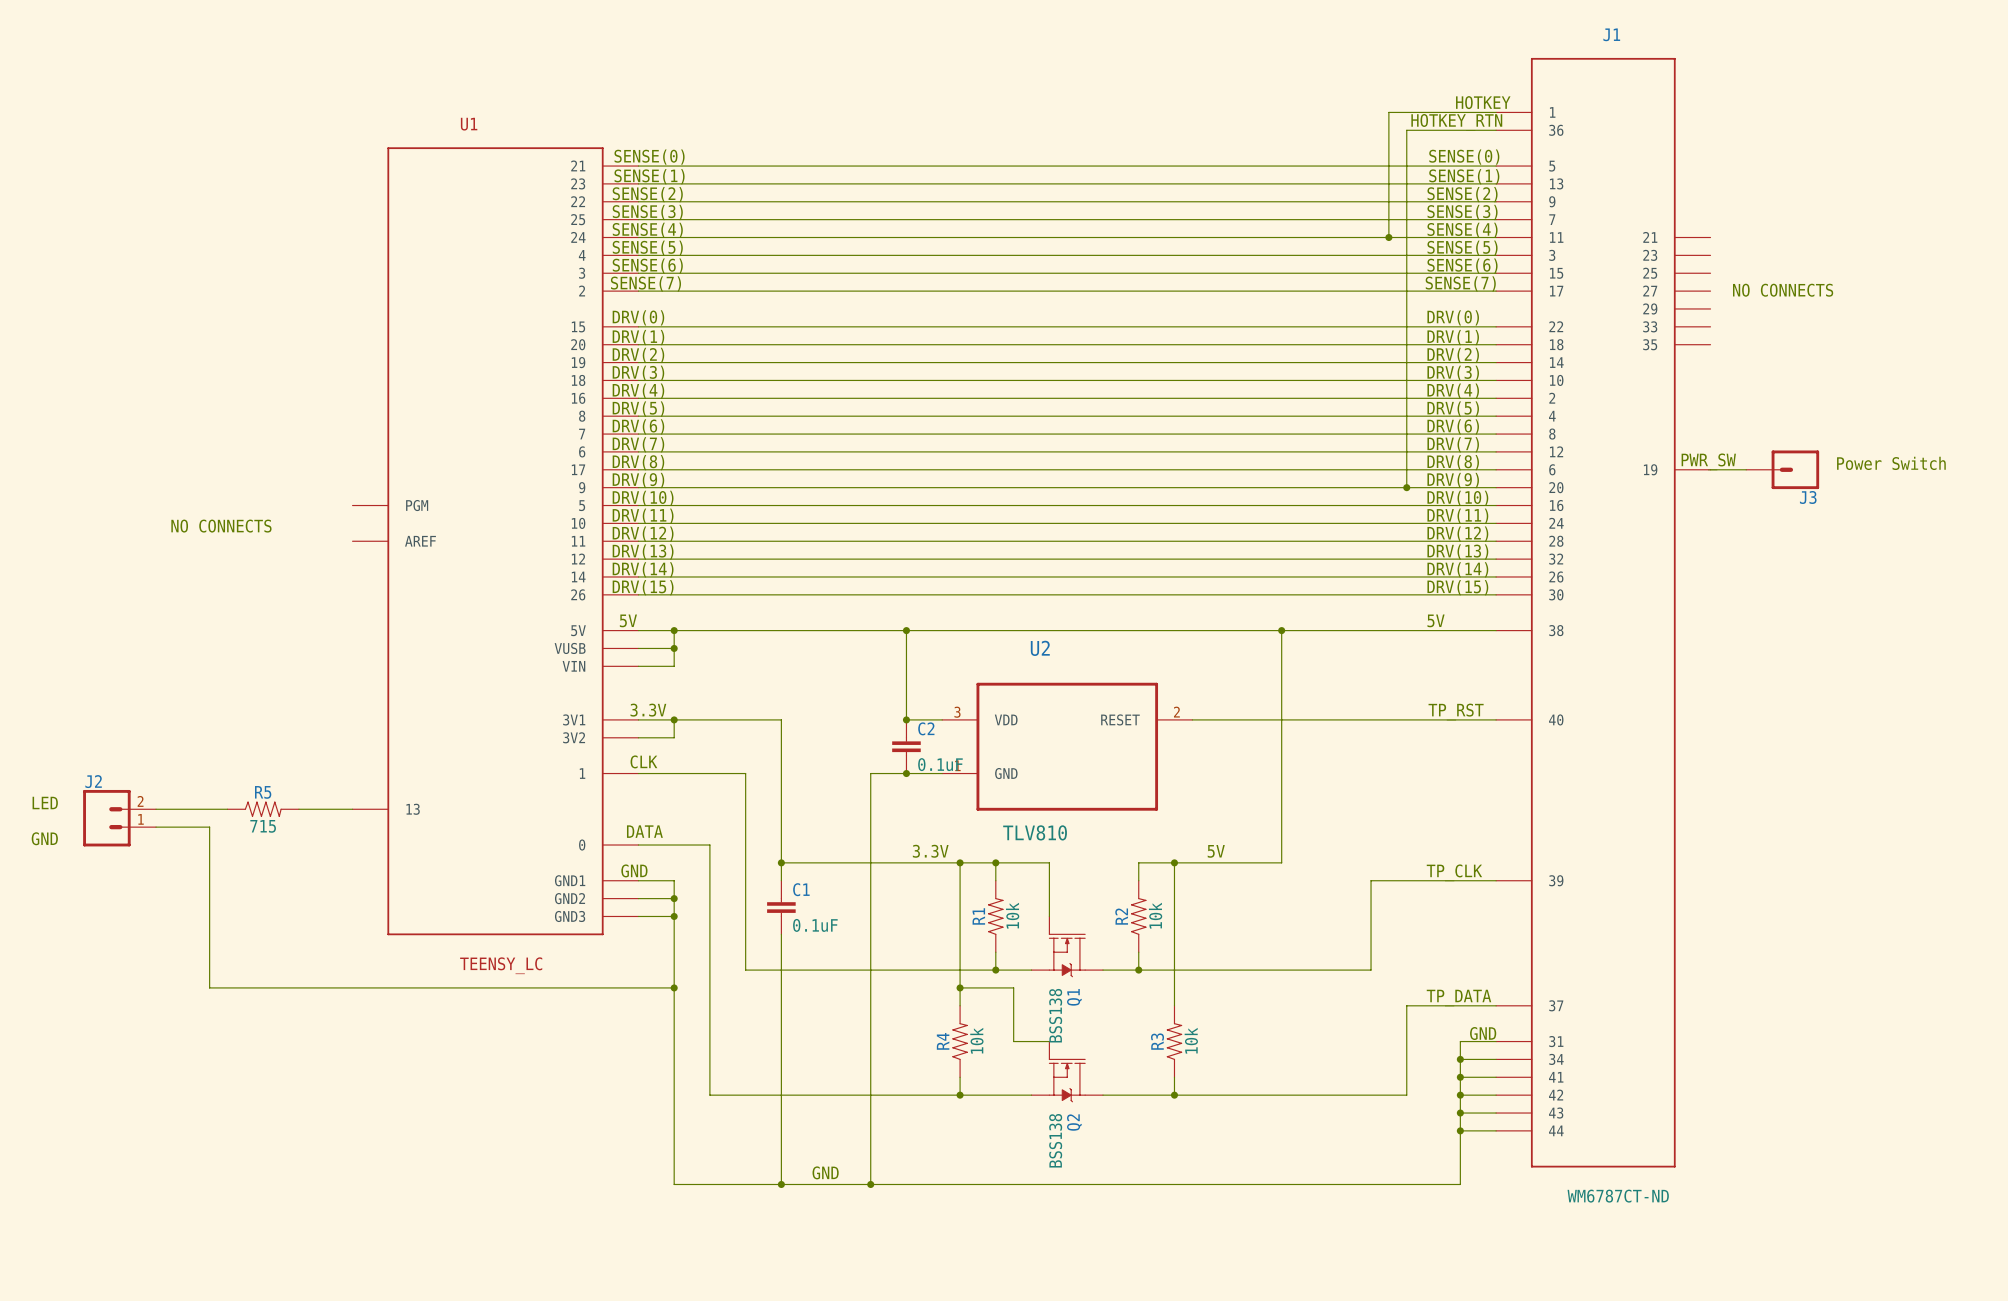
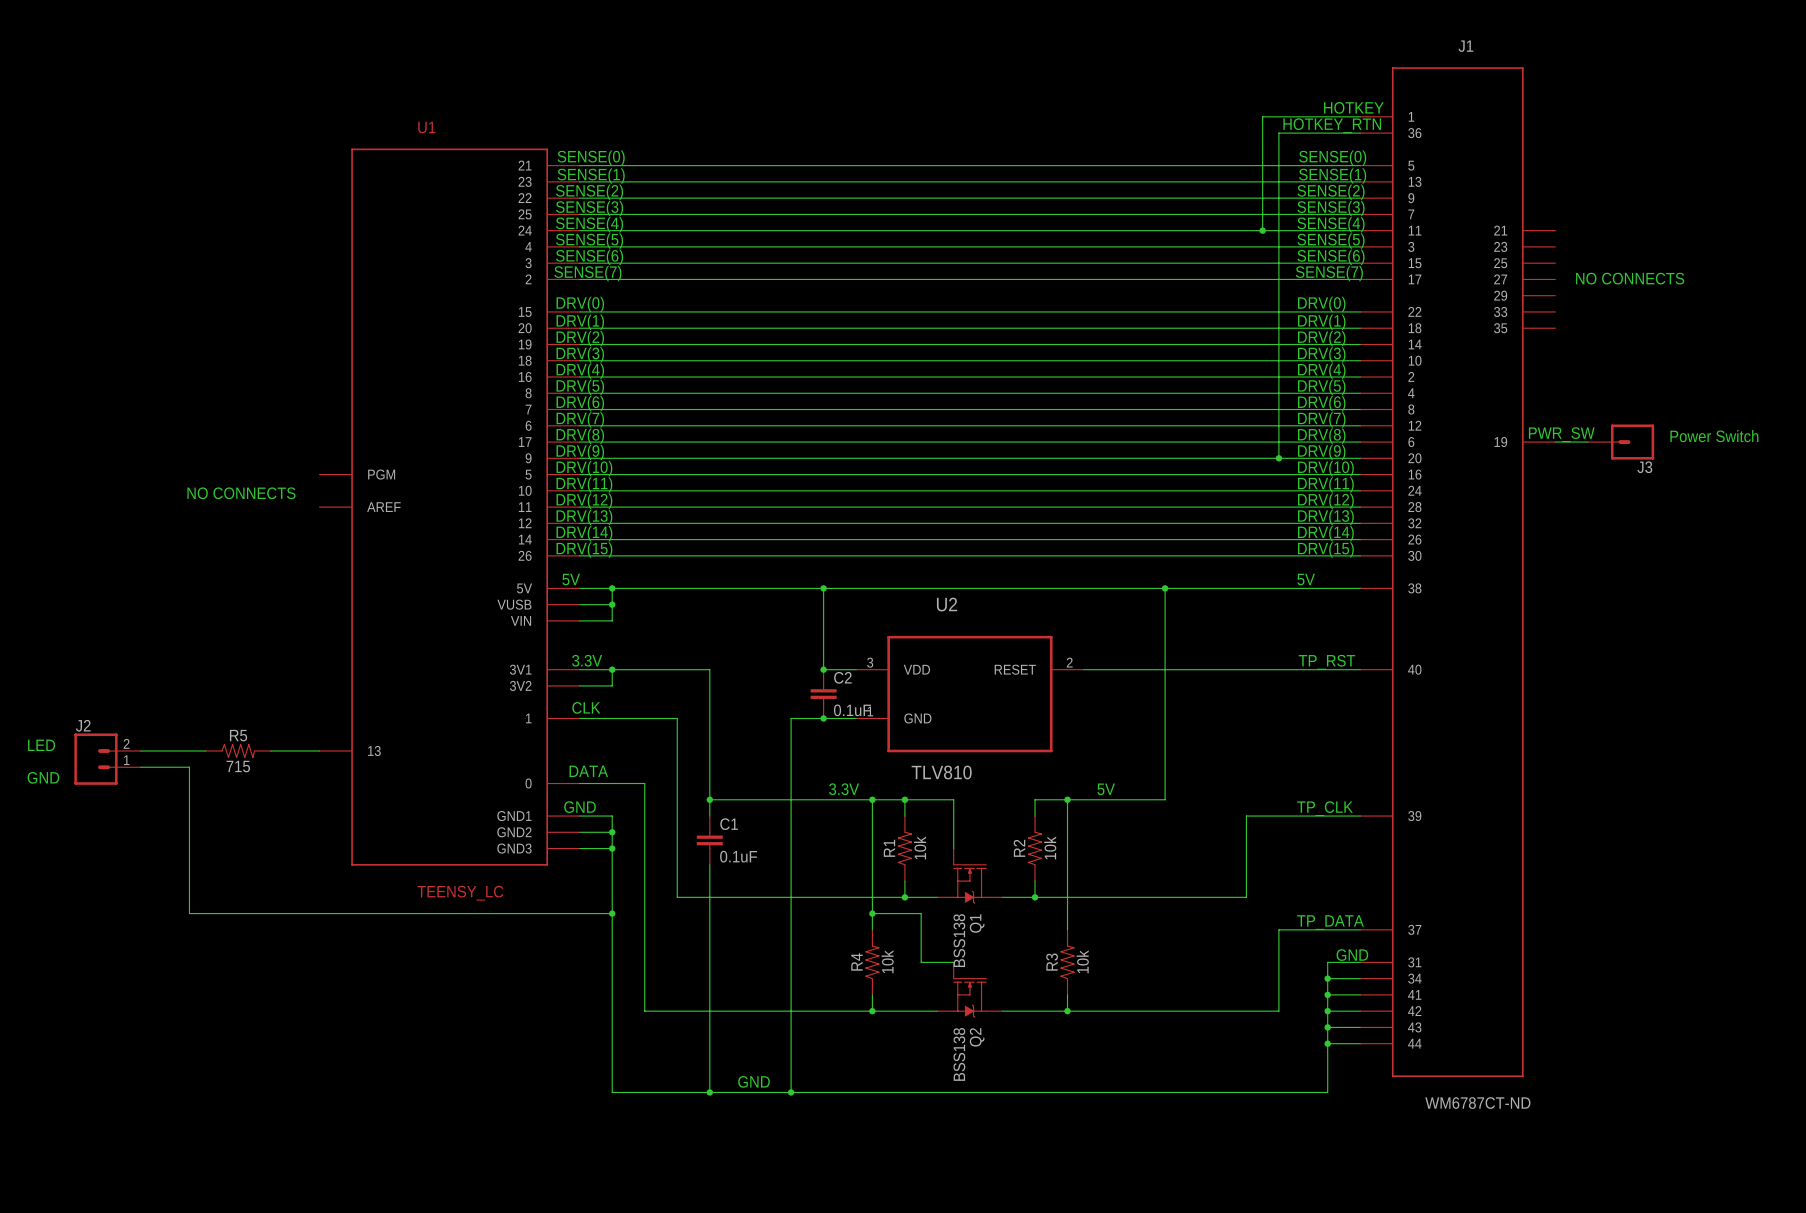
text position: NO CONNECTS (221, 526) -> NO CONNECTS (241, 493)

